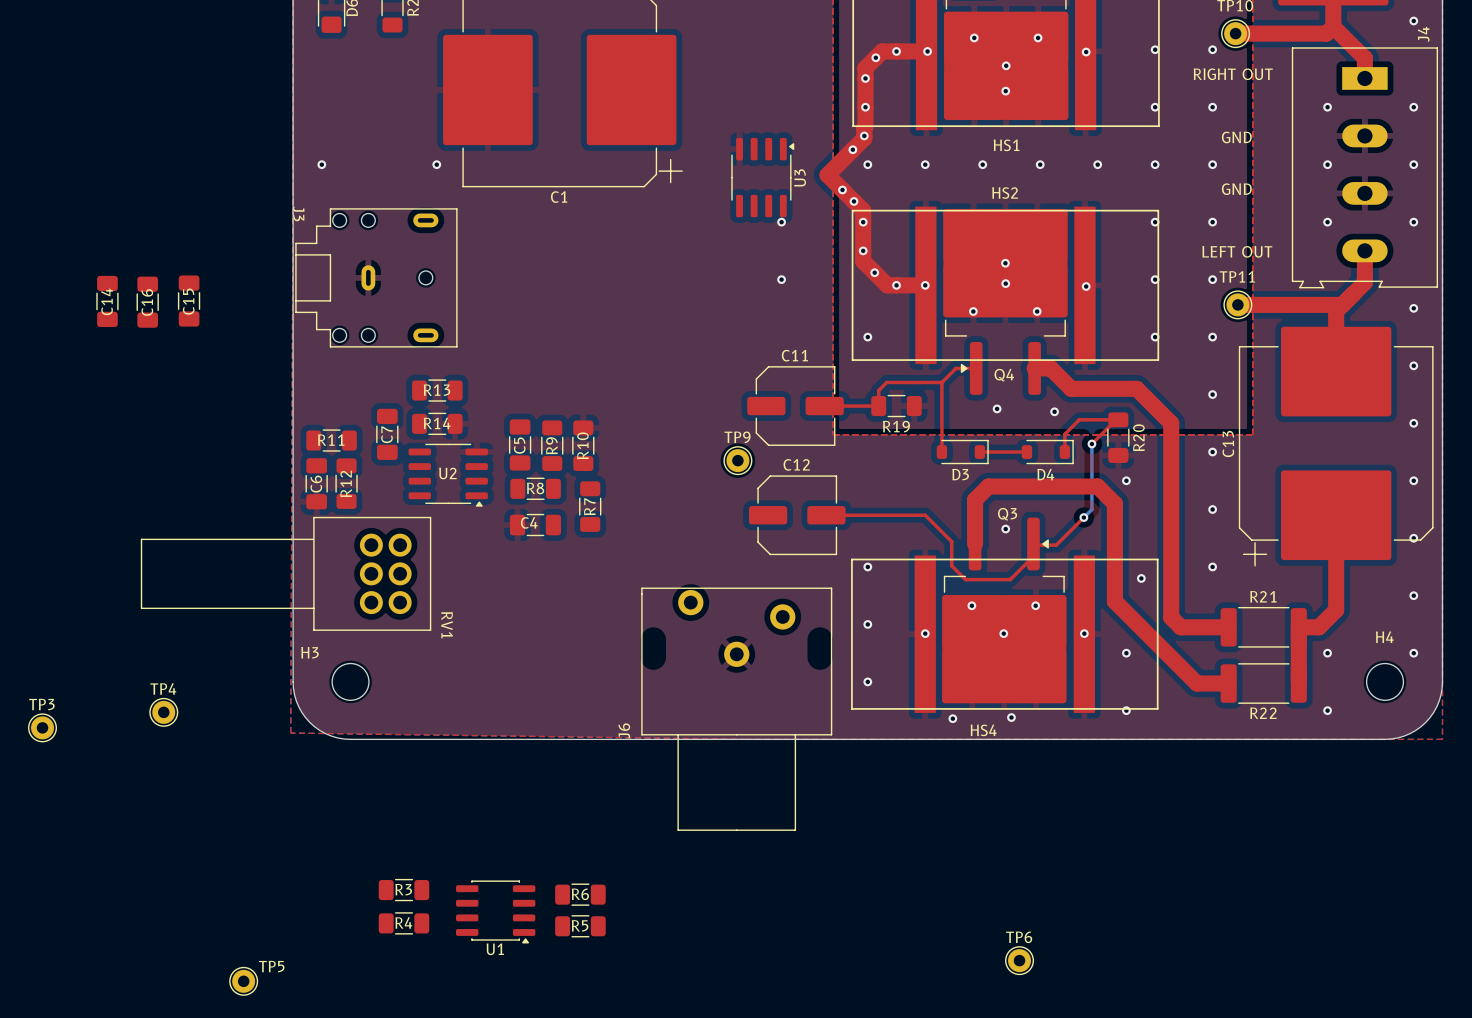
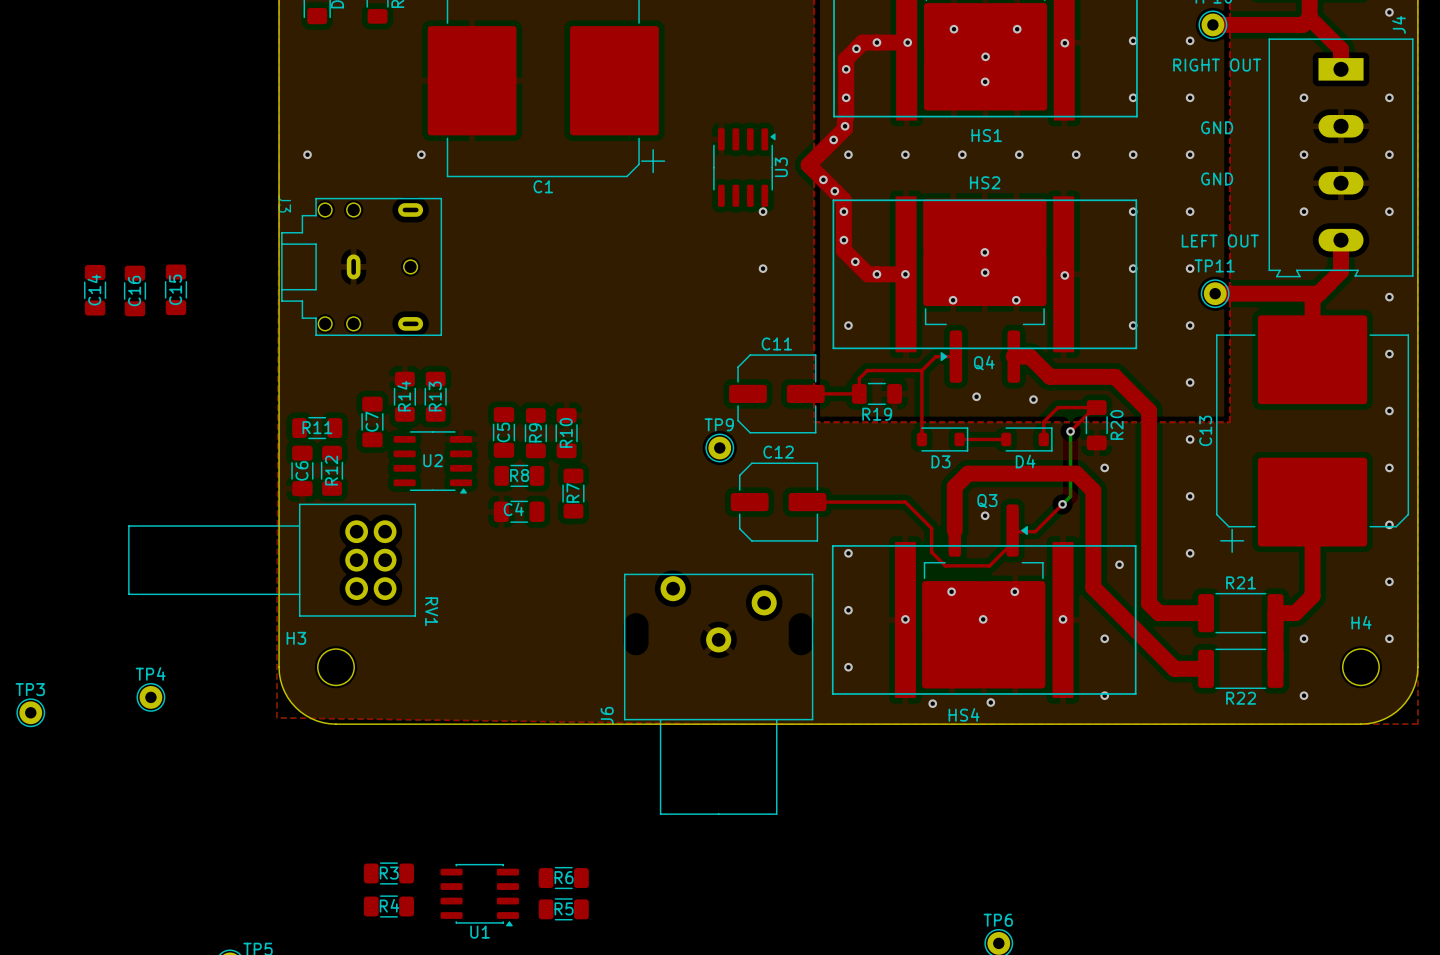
R13 rotation: 0° (437, 390) -> 90° clockwise (435, 396)
R14 rotation: 0° (437, 423) -> 90° clockwise (404, 396)

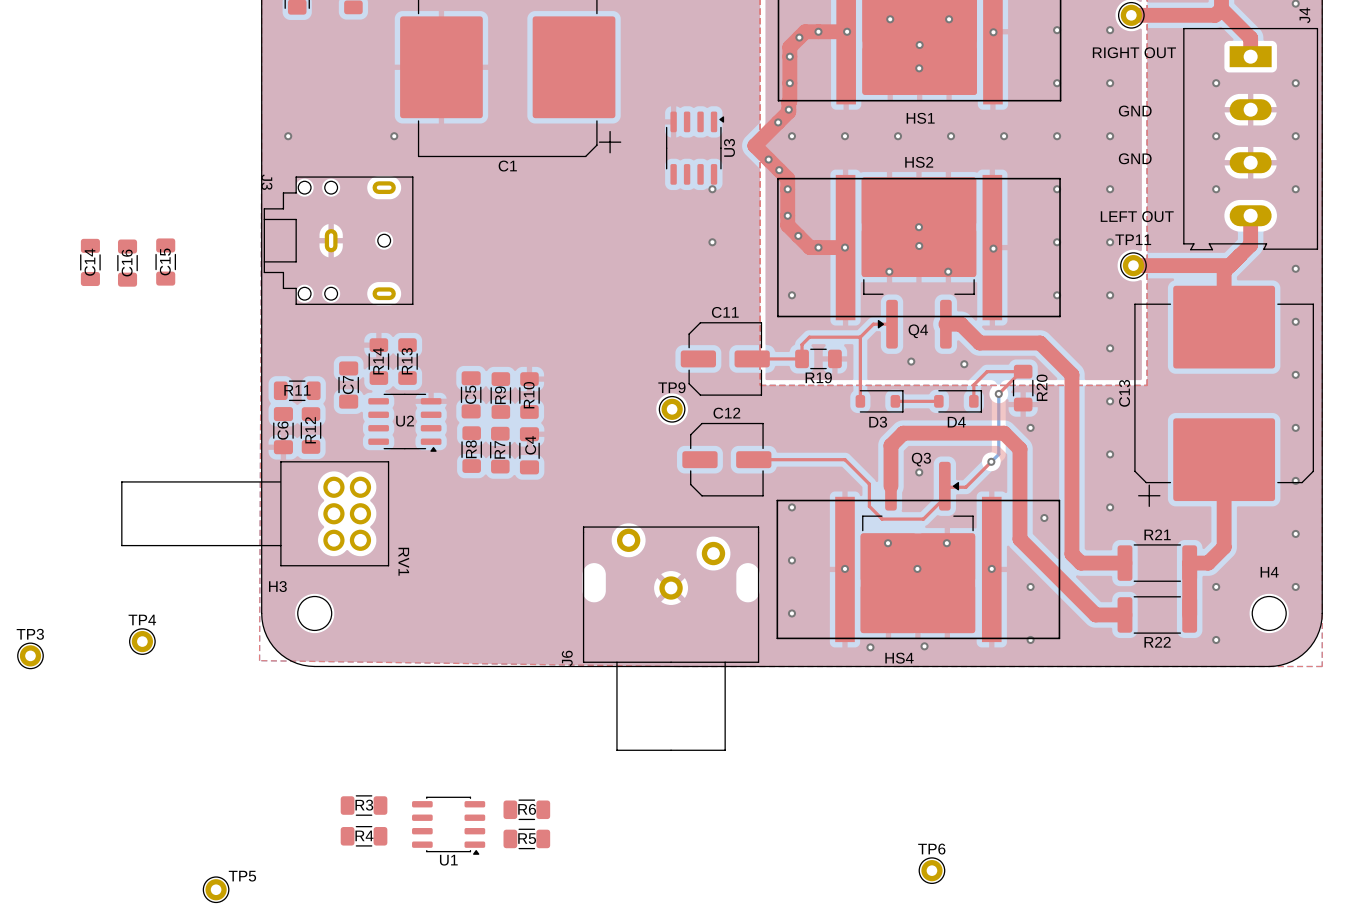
R8 rotation: 0° (519, 475) -> 90° clockwise (471, 449)
R7 position: (573, 493) -> (500, 450)
C4 rotation: 0° (519, 511) -> 90° clockwise (529, 450)
C4 position: (519, 511) -> (529, 450)

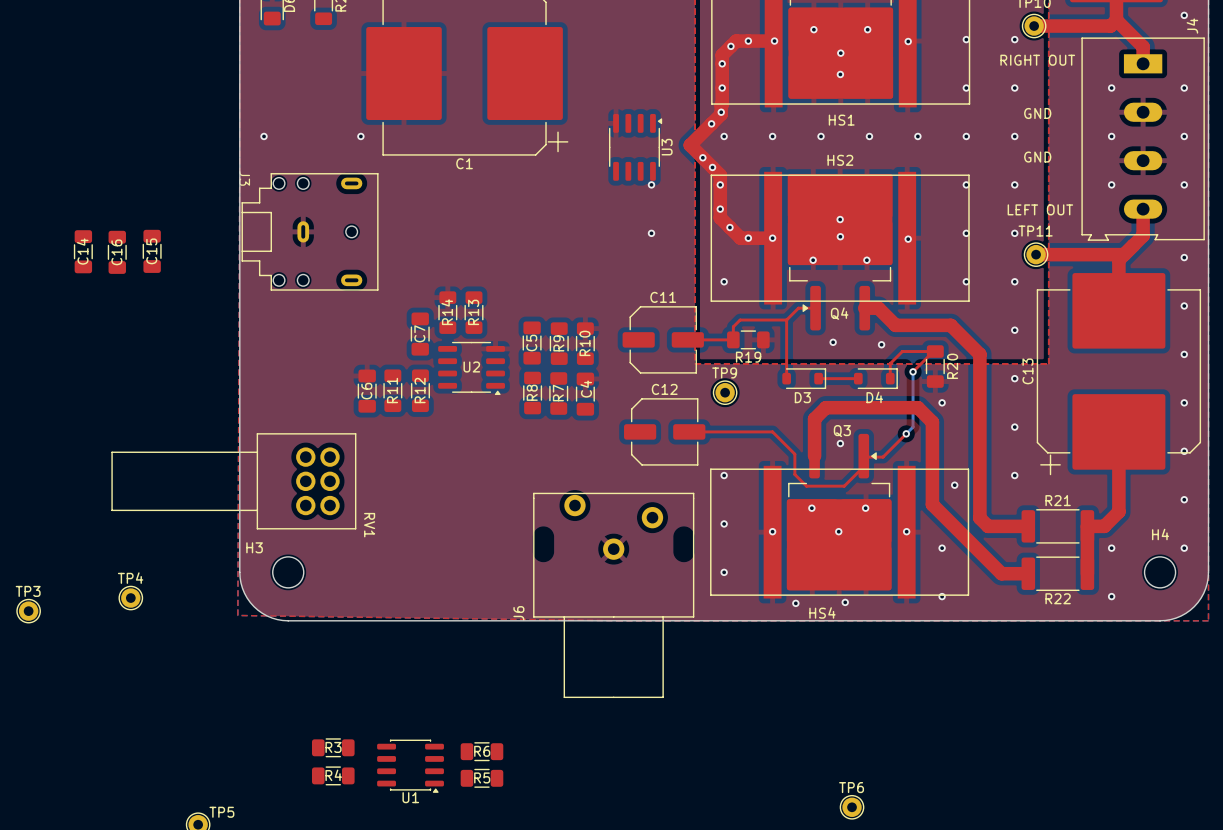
R14 position: (378, 361) -> (447, 312)
R13 position: (407, 361) -> (473, 312)
C7 position: (348, 385) -> (420, 334)
R11 rotation: 0° (297, 390) -> 90° clockwise (392, 390)
R11 position: (297, 390) -> (392, 390)
C5 position: (471, 394) -> (532, 343)
R9 position: (500, 395) -> (559, 343)
R10 position: (529, 395) -> (585, 343)
TP9 position: (672, 409) -> (725, 392)
U2 position: (404, 422) -> (471, 368)
C6 position: (283, 430) -> (367, 391)
R12 position: (311, 430) -> (420, 390)
R8 position: (471, 449) -> (532, 393)
R7 position: (500, 450) -> (558, 393)
C4 position: (529, 450) -> (585, 394)

